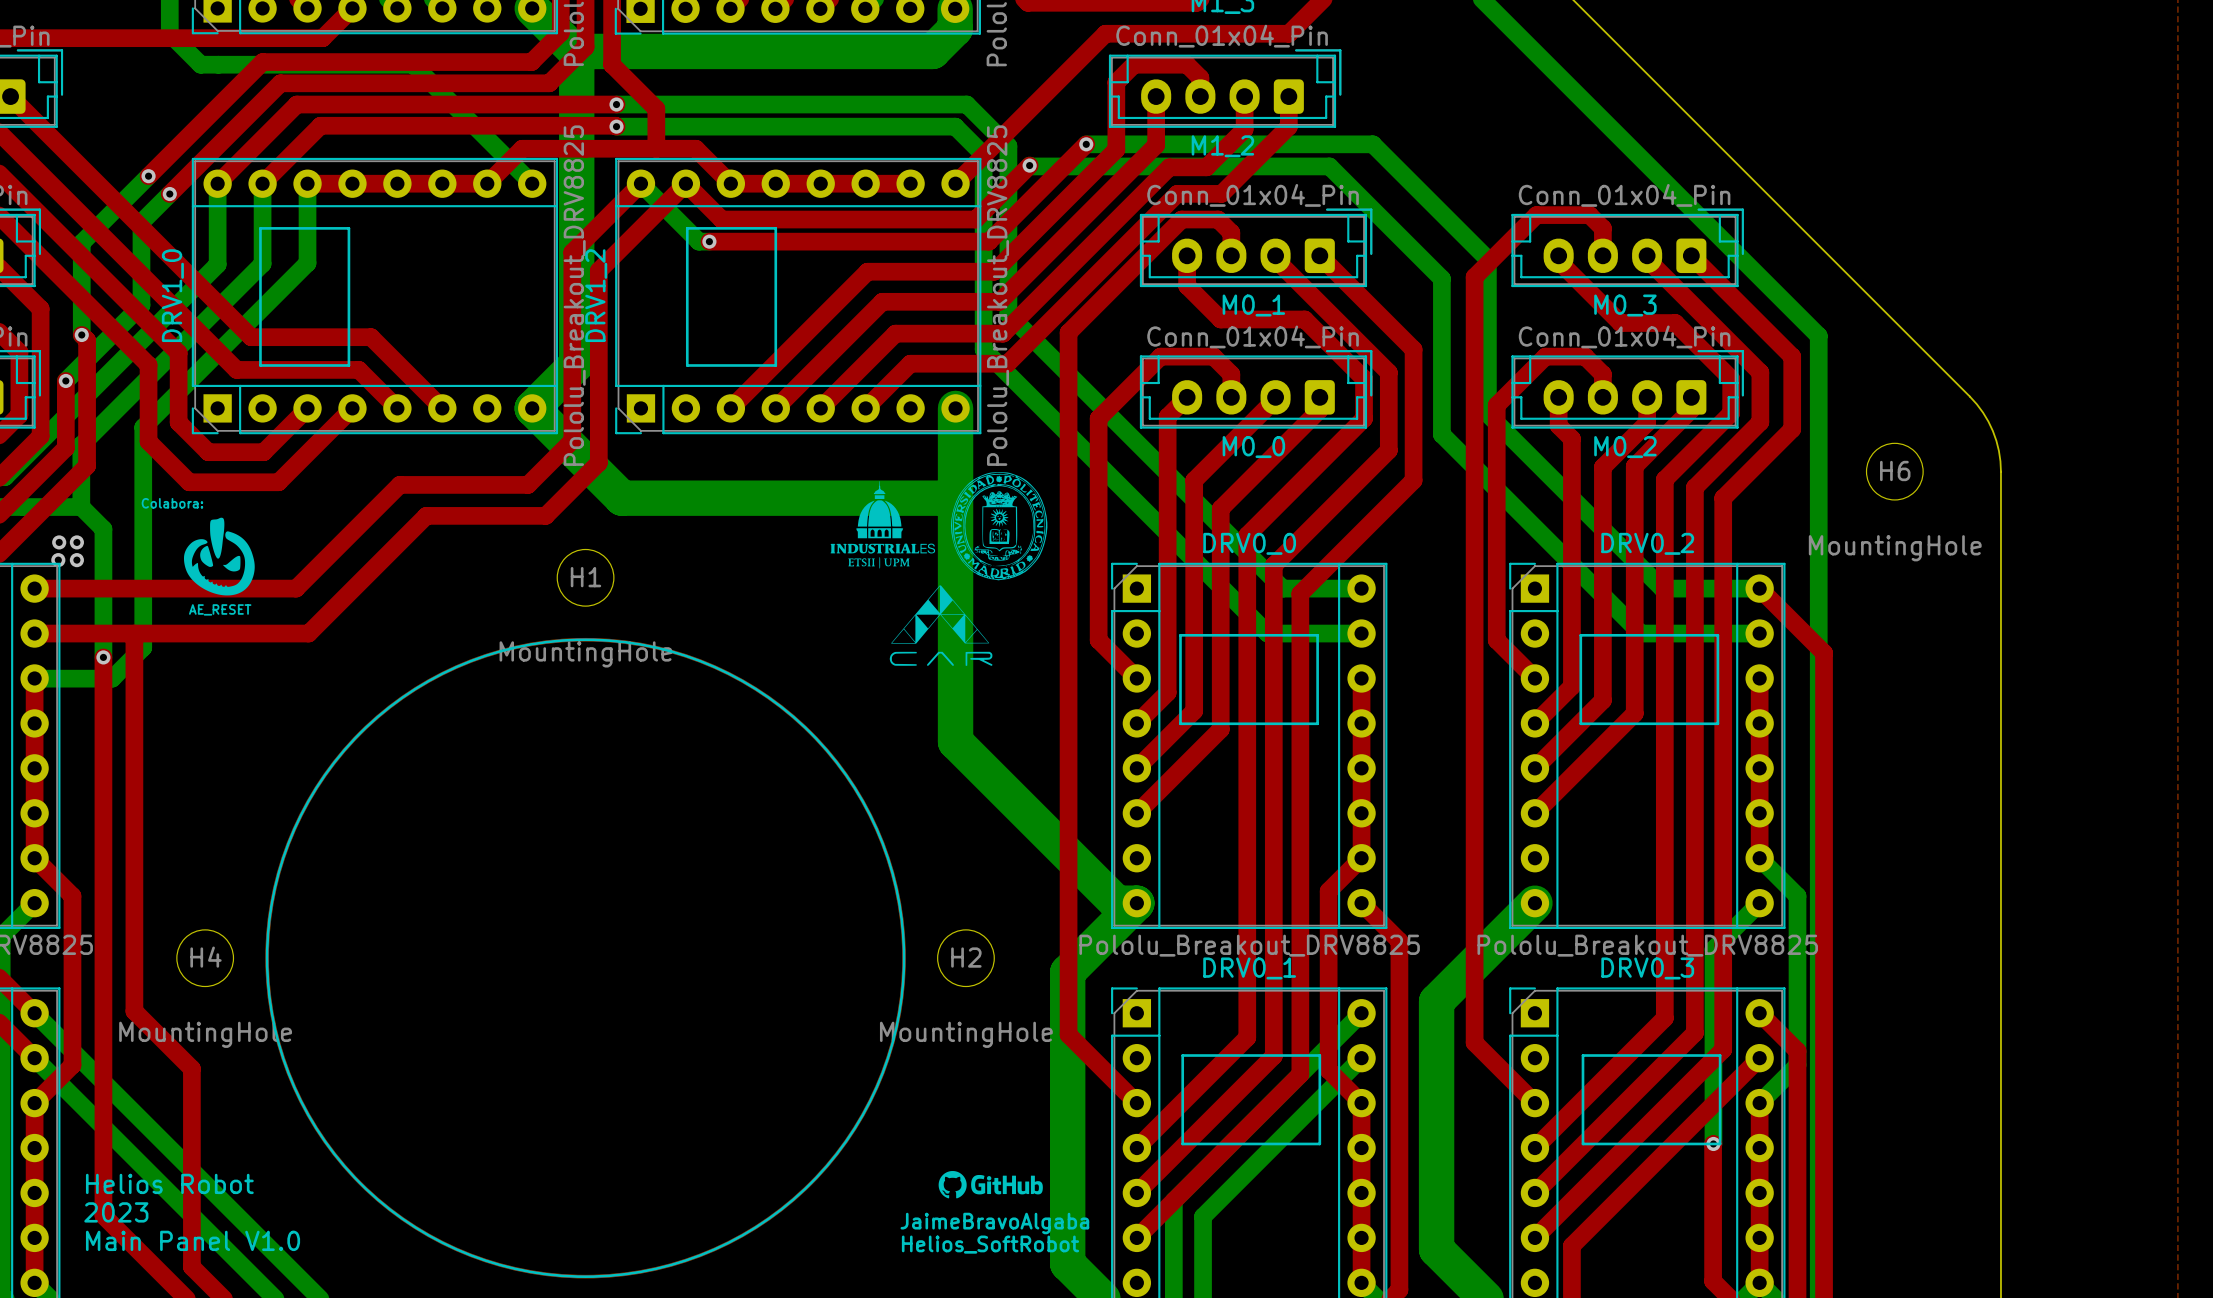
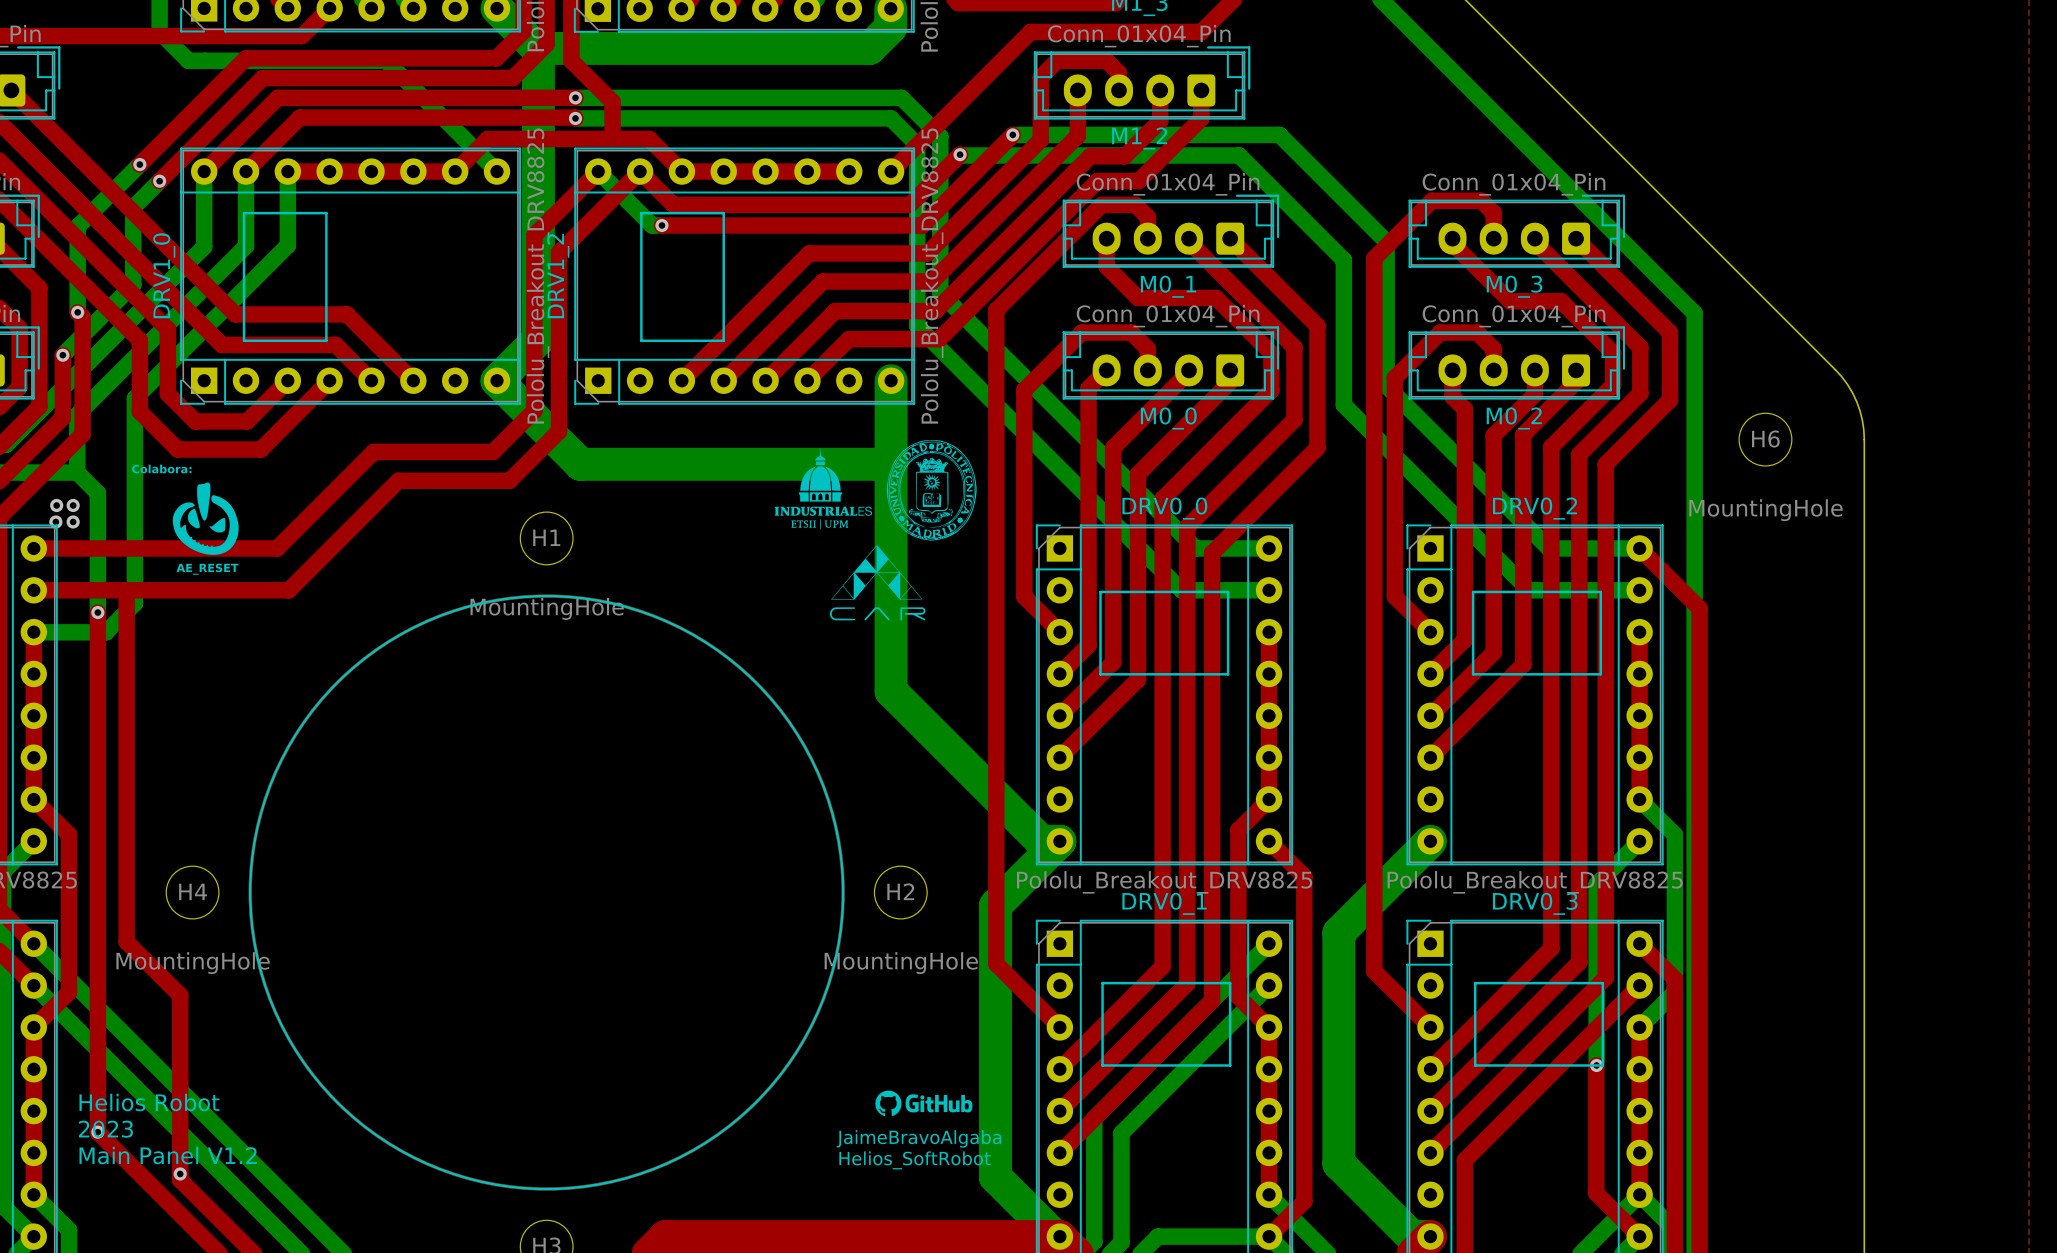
via: none -> (97, 1132)
text: Main Panel V1.0 (193, 1240) -> Main Panel V1.2 (168, 1155)
via: none -> (180, 1173)

